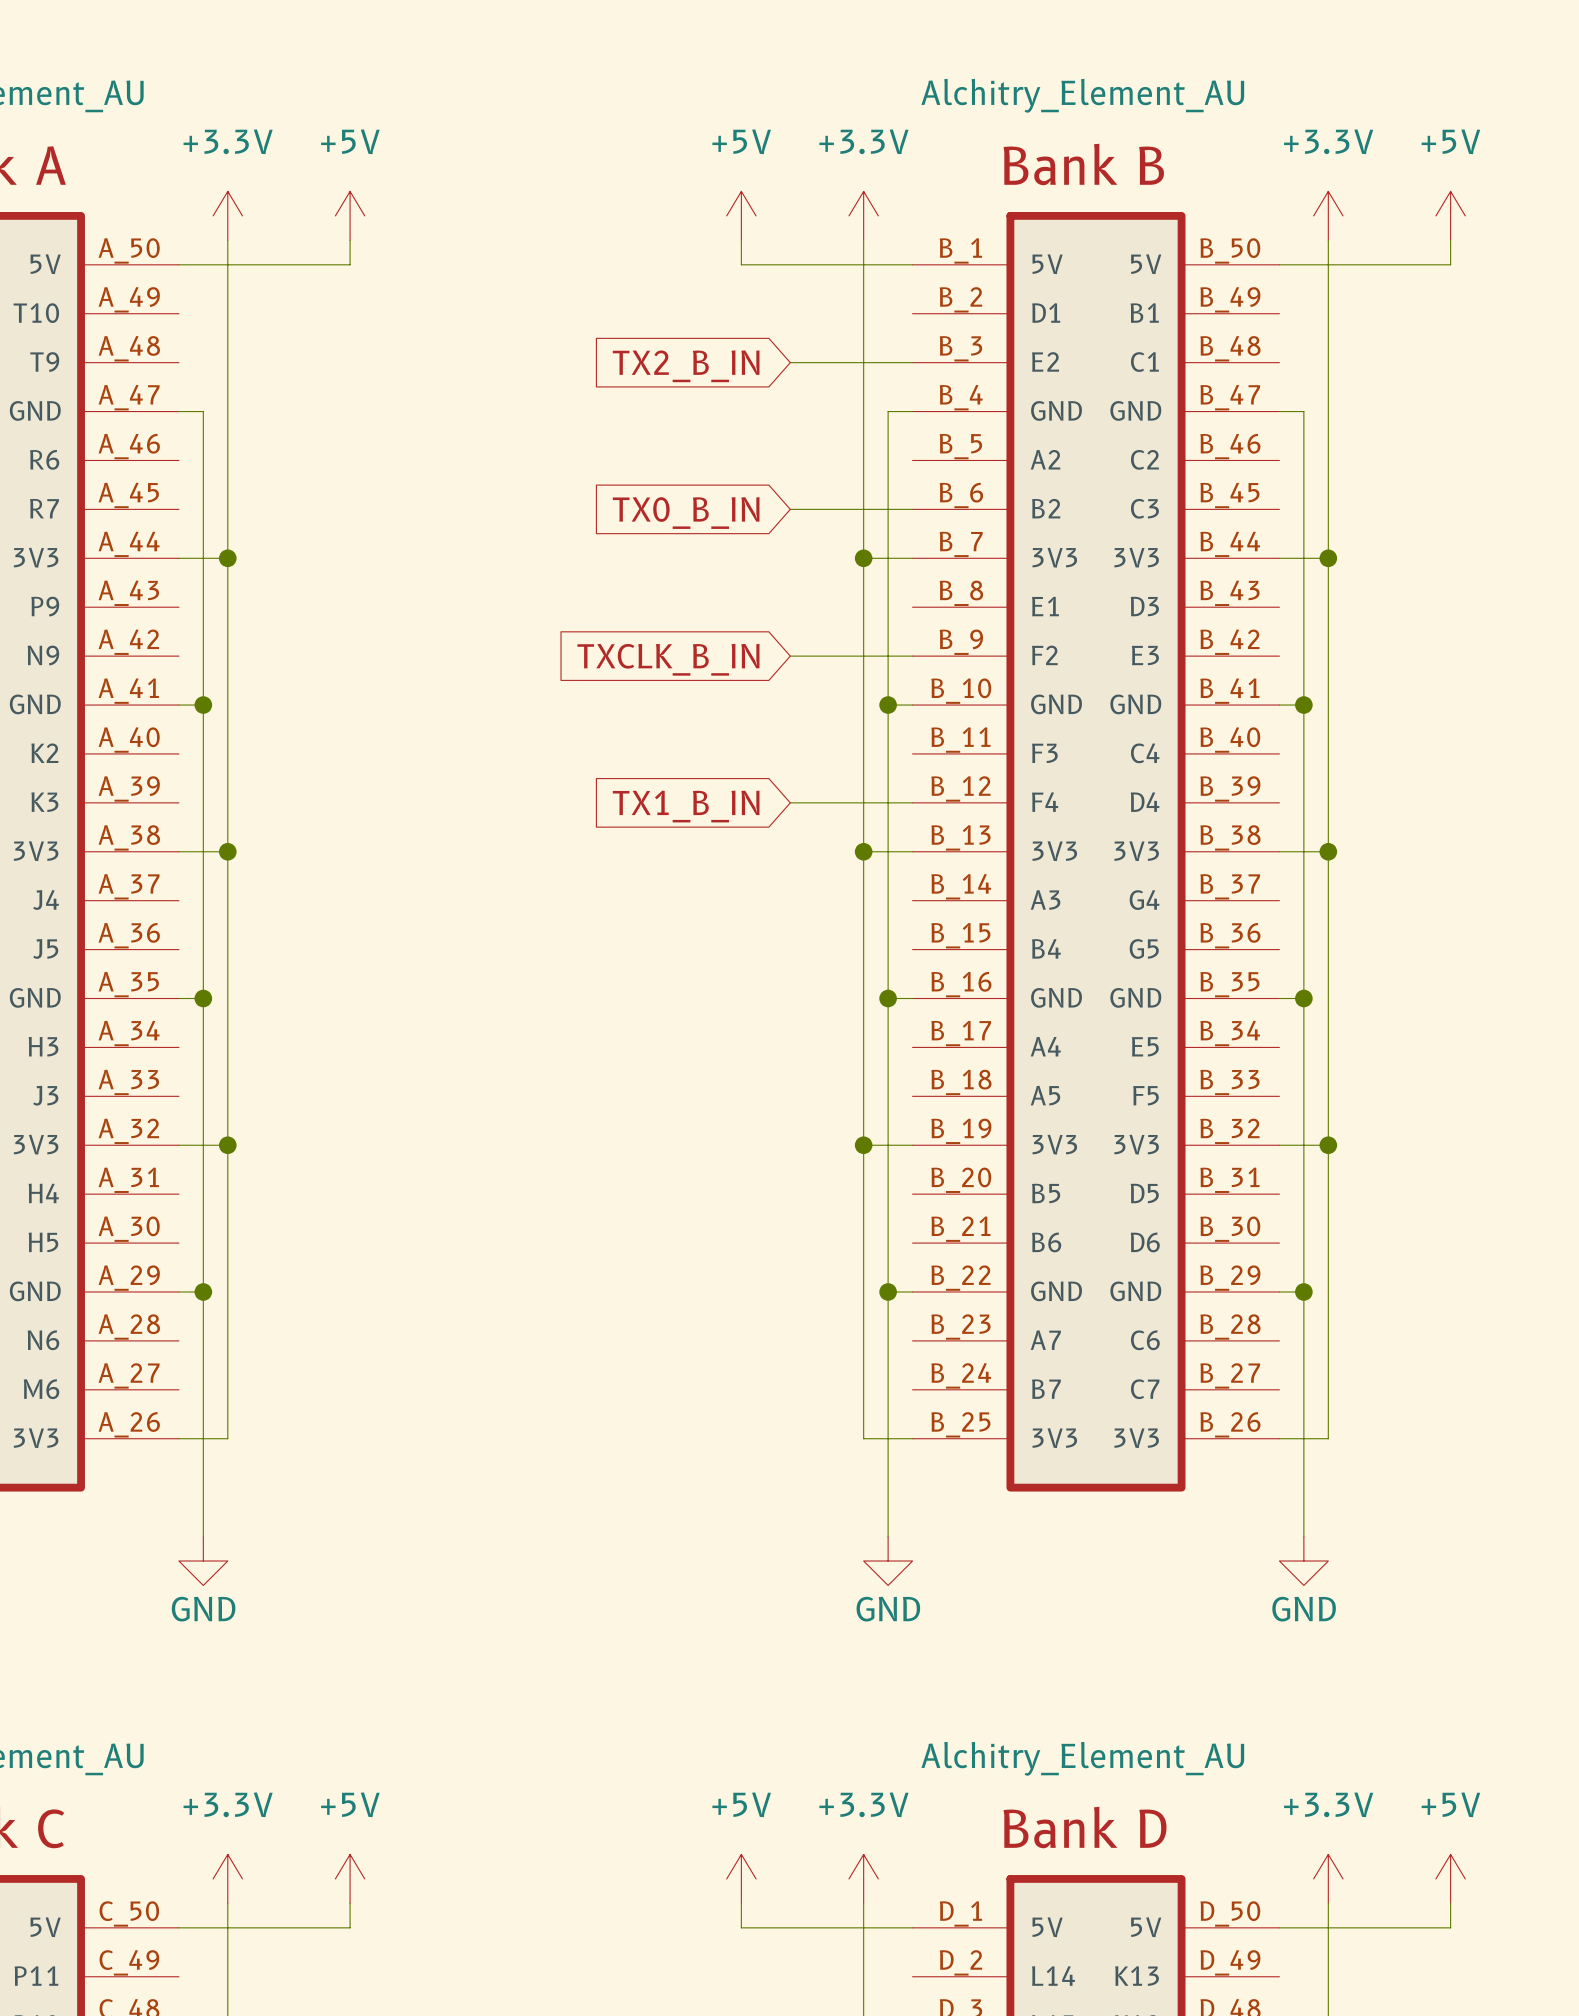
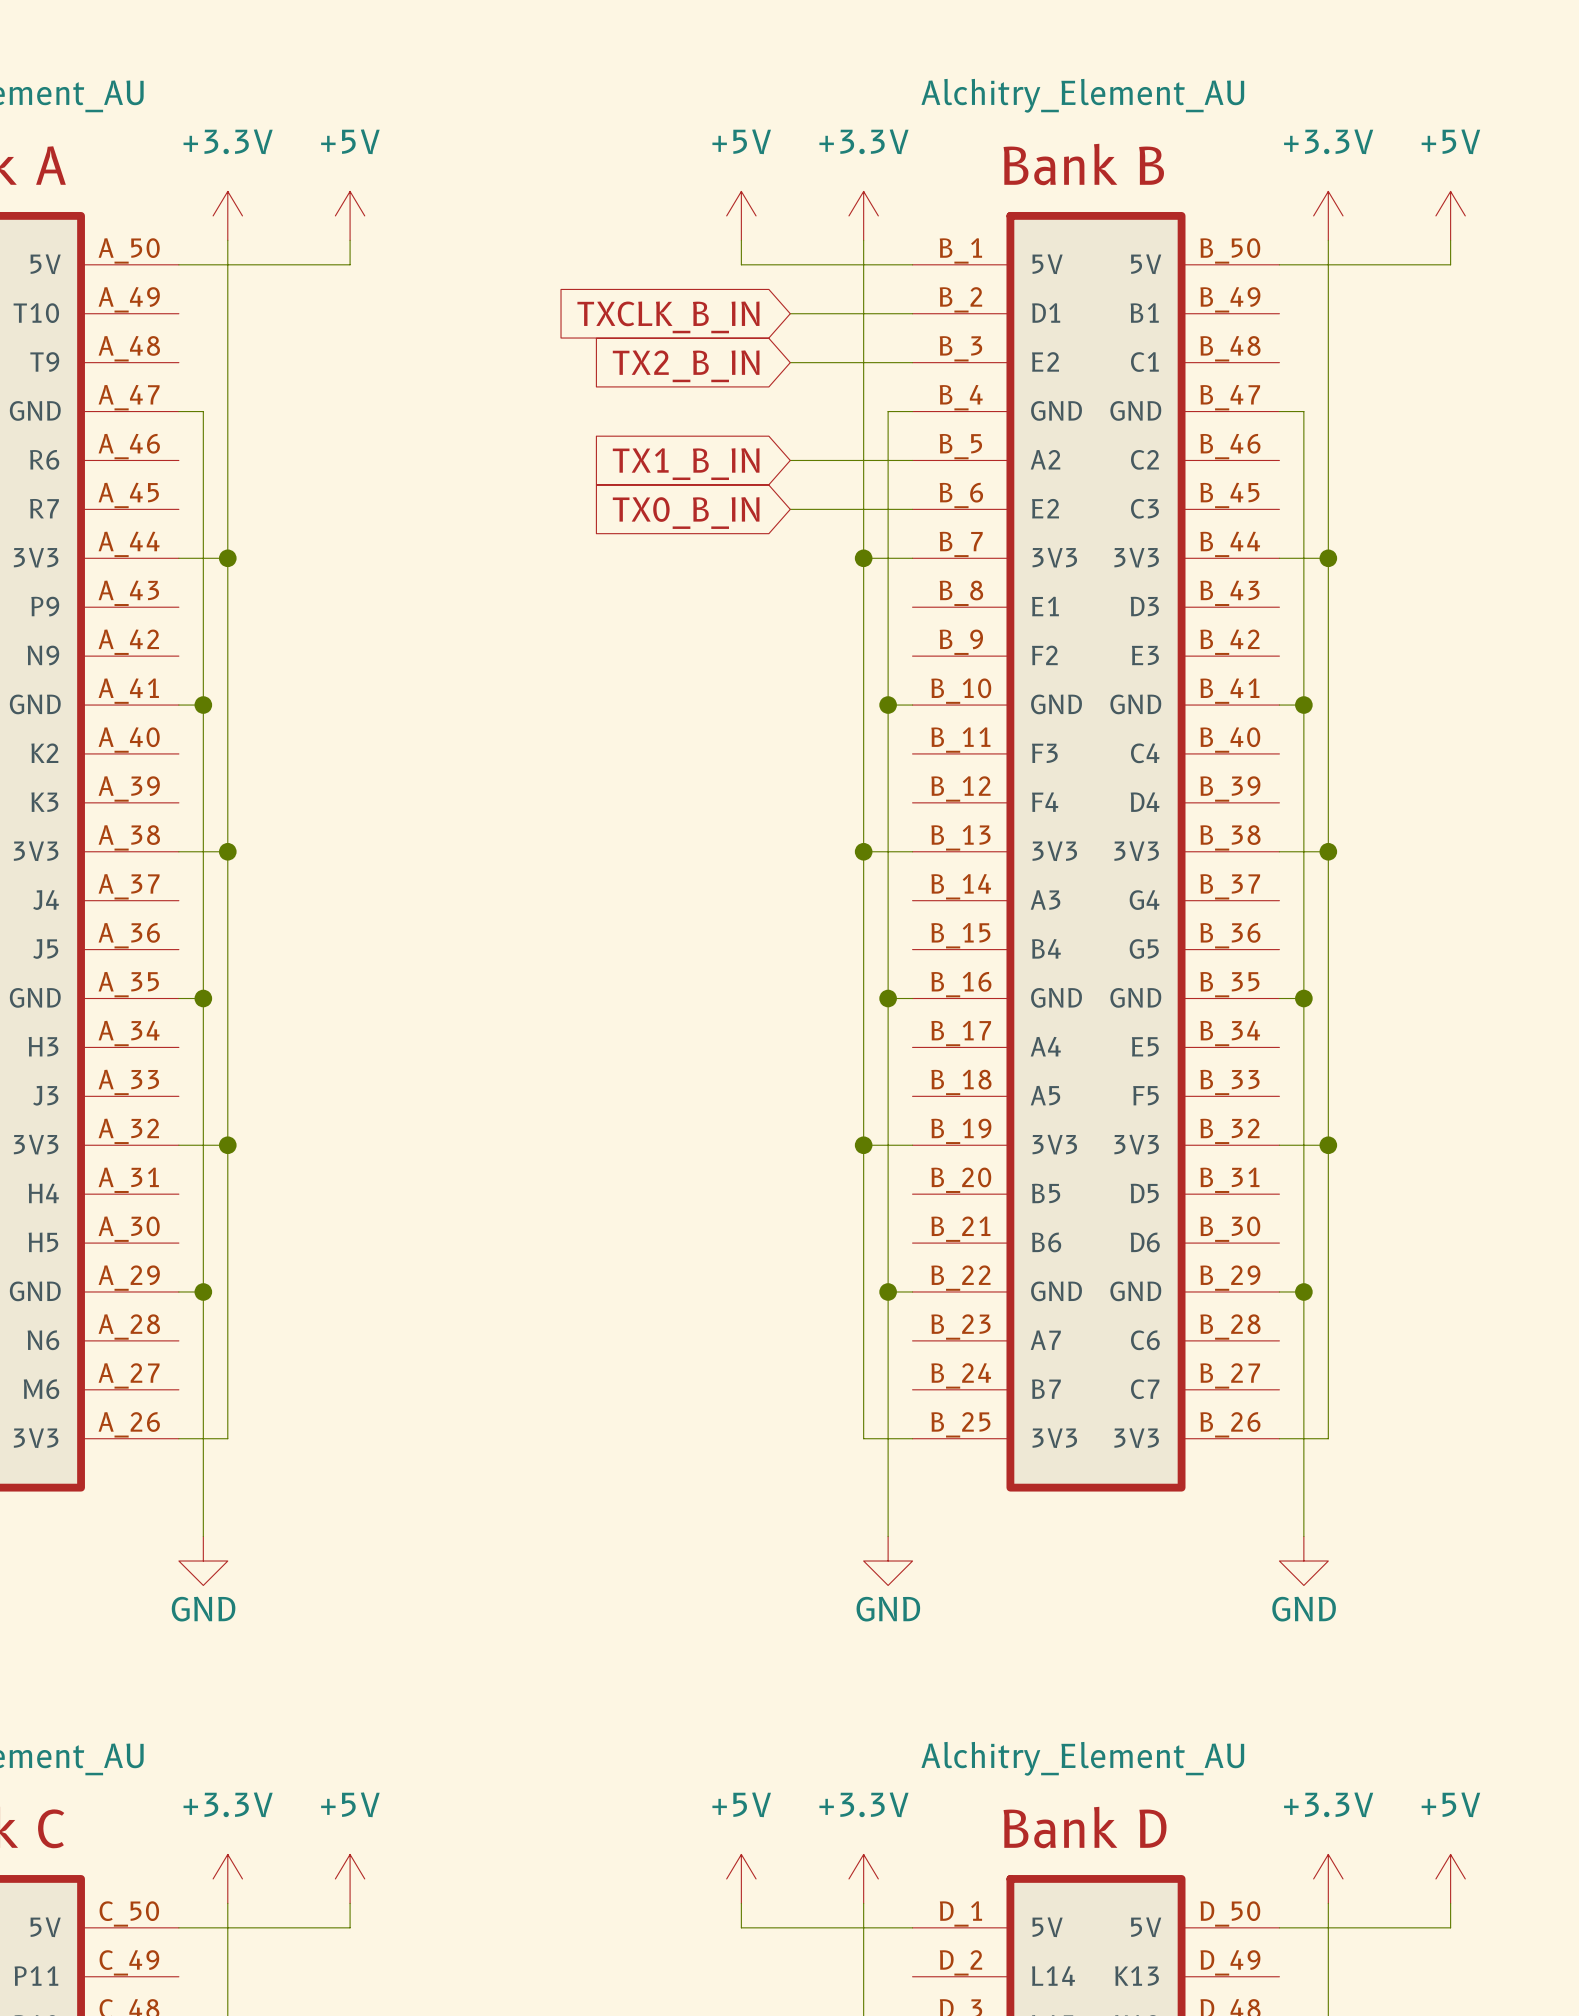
part pin name: B2 (1046, 508) -> E2 (1045, 508)
wire: (790, 656) (912, 656) -> (790, 313) (912, 313)
global label position: TXCLK_B_IN (668, 659) -> TXCLK_B_IN (668, 317)
wire: (790, 802) (912, 802) -> (790, 460) (912, 460)
global label position: TX1_B_IN (686, 806) -> TX1_B_IN (686, 464)

